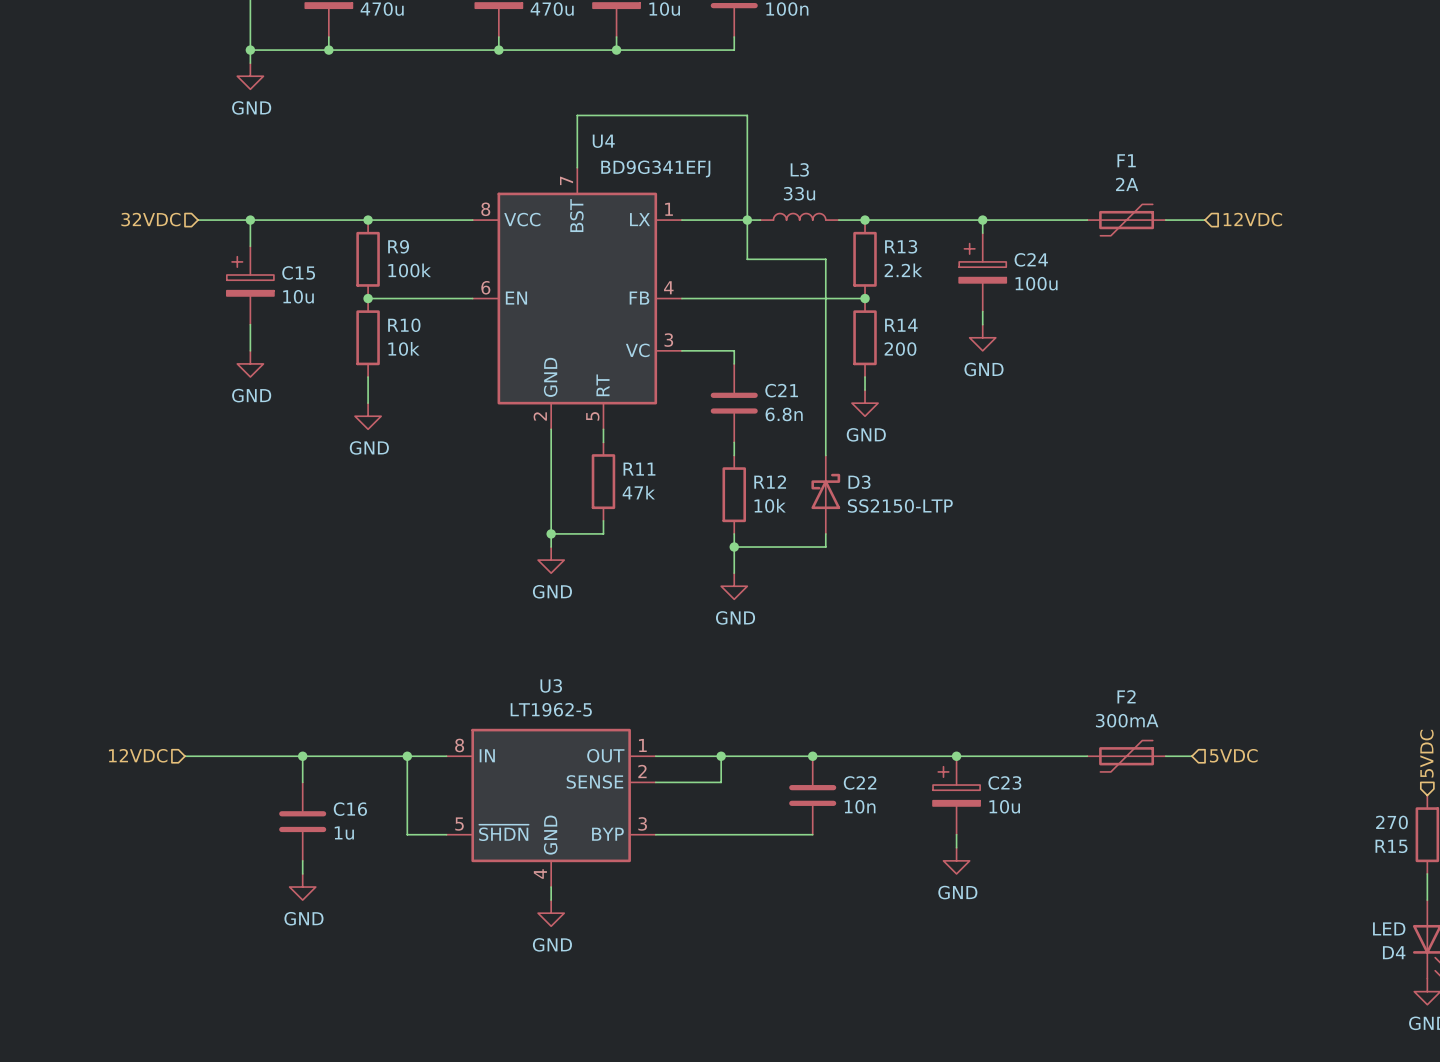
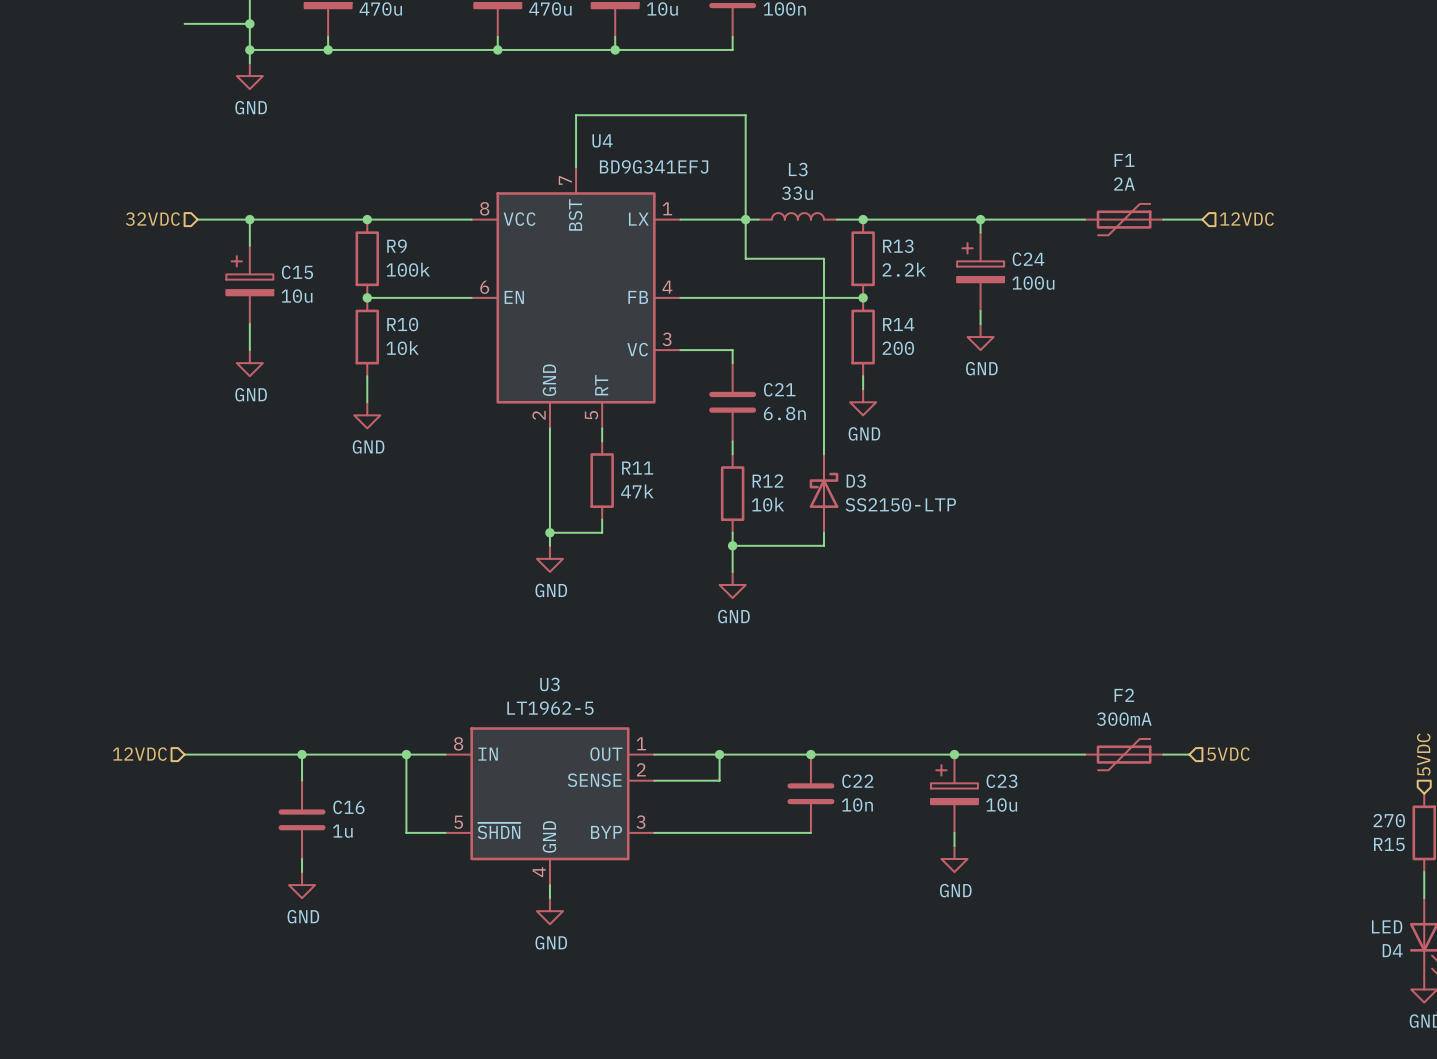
wire: none -> (184, 23) (249, 23)
junction: none -> (249, 23)

